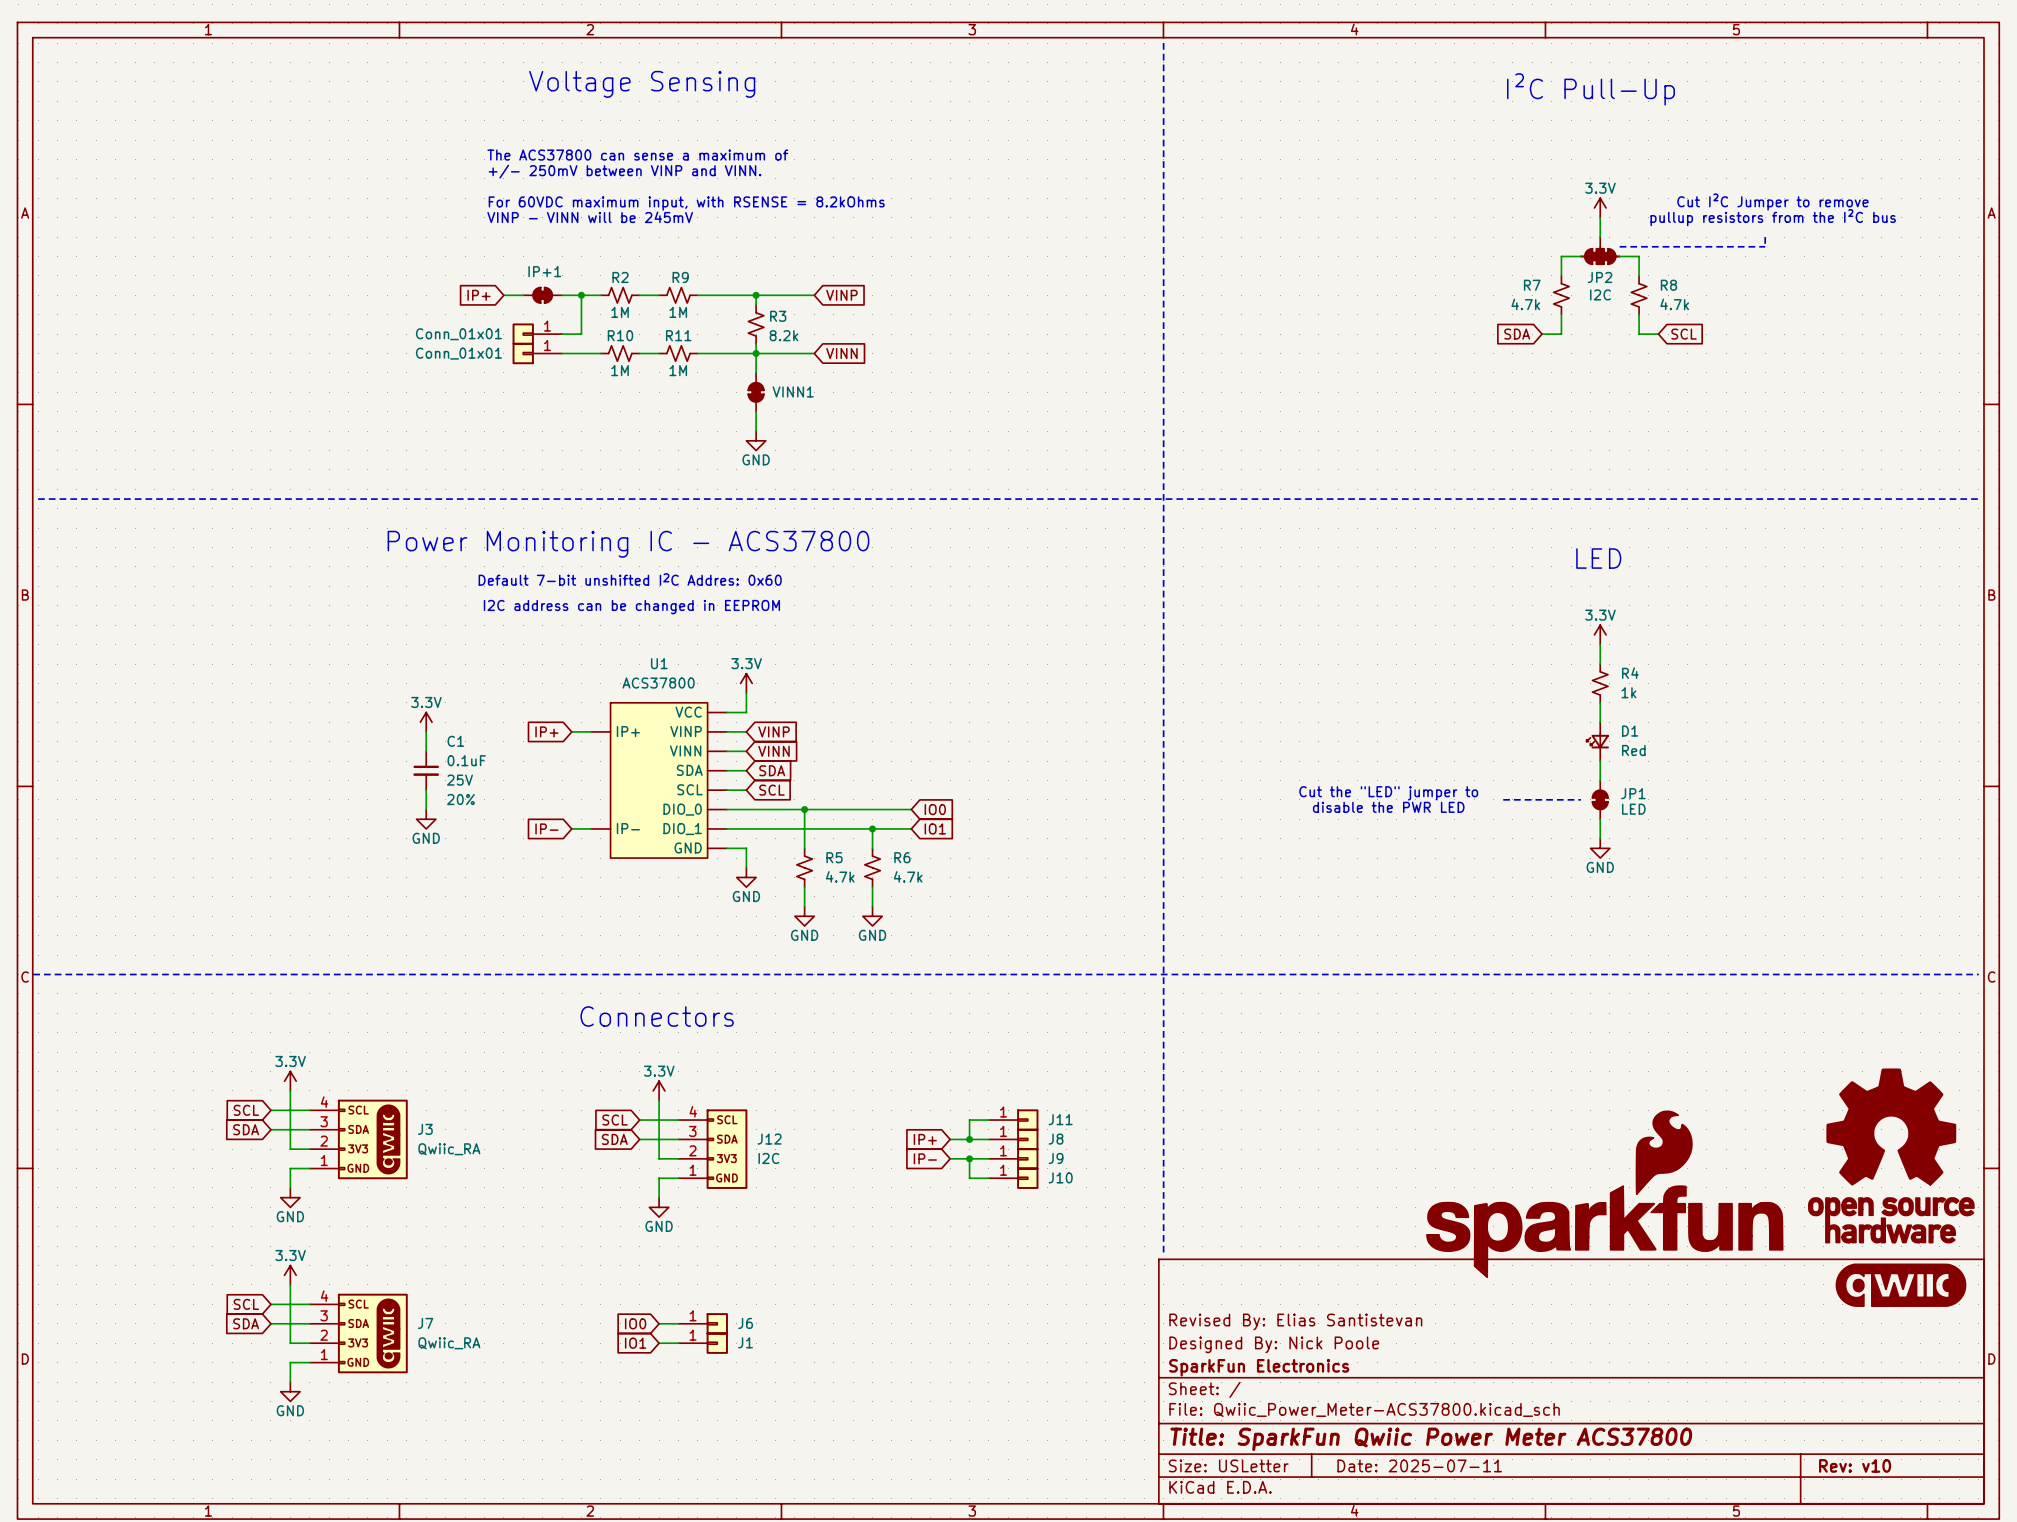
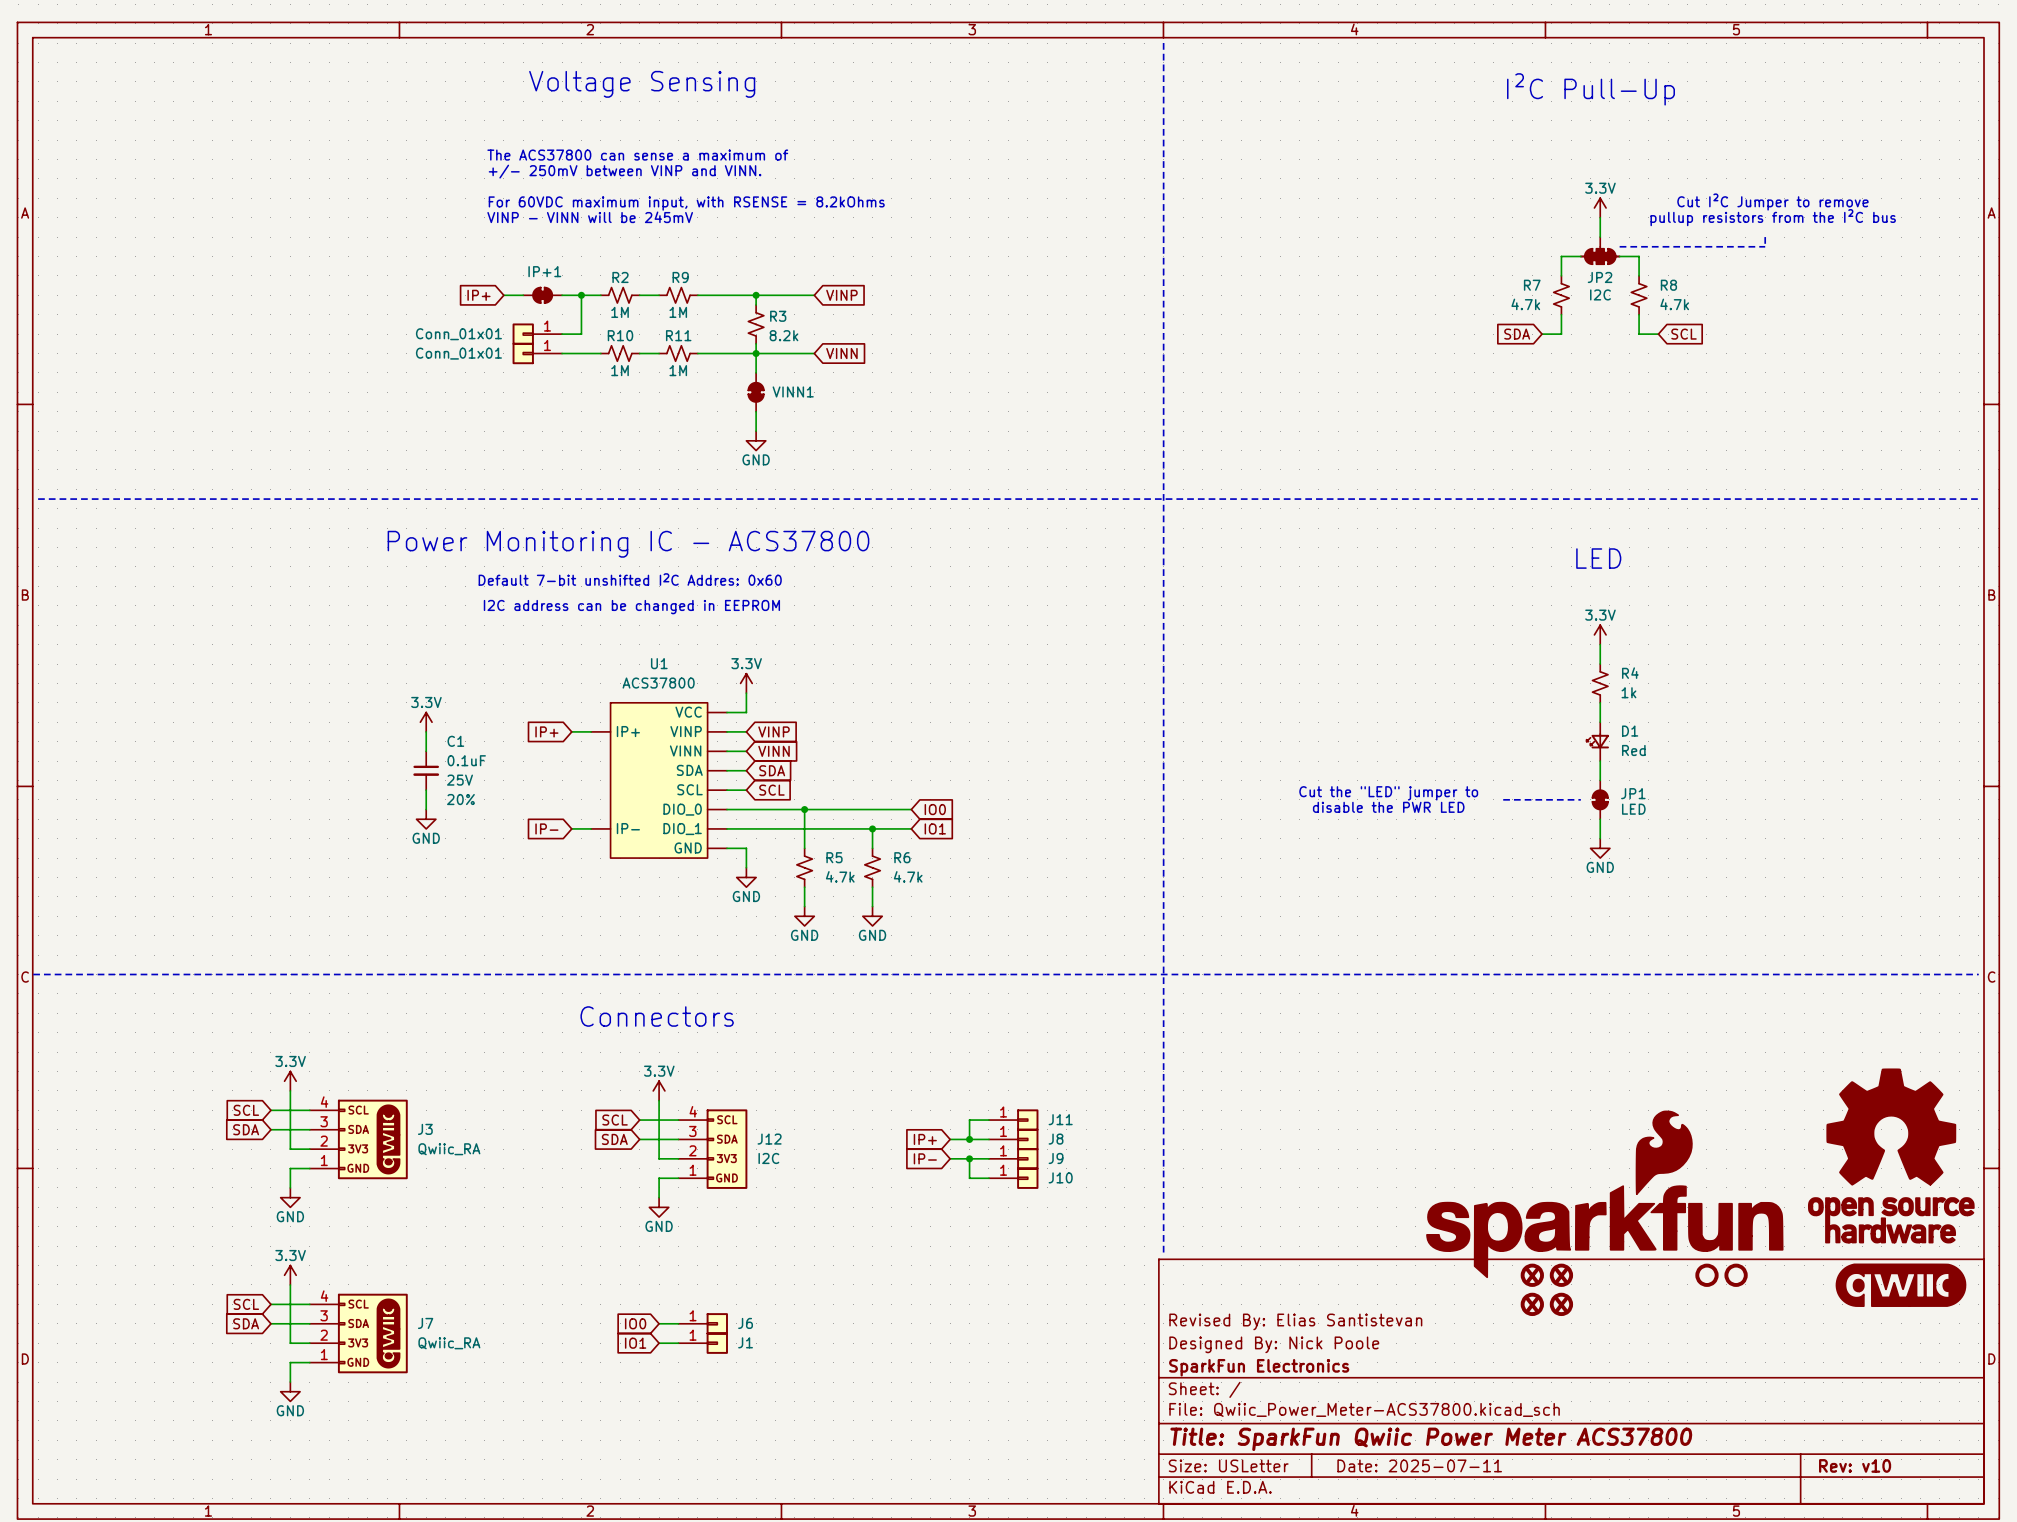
part: none -> (1532, 1275)
part: none -> (1561, 1275)
part: none -> (1706, 1275)
part: none -> (1736, 1275)
part: none -> (1532, 1304)
part: none -> (1561, 1304)

